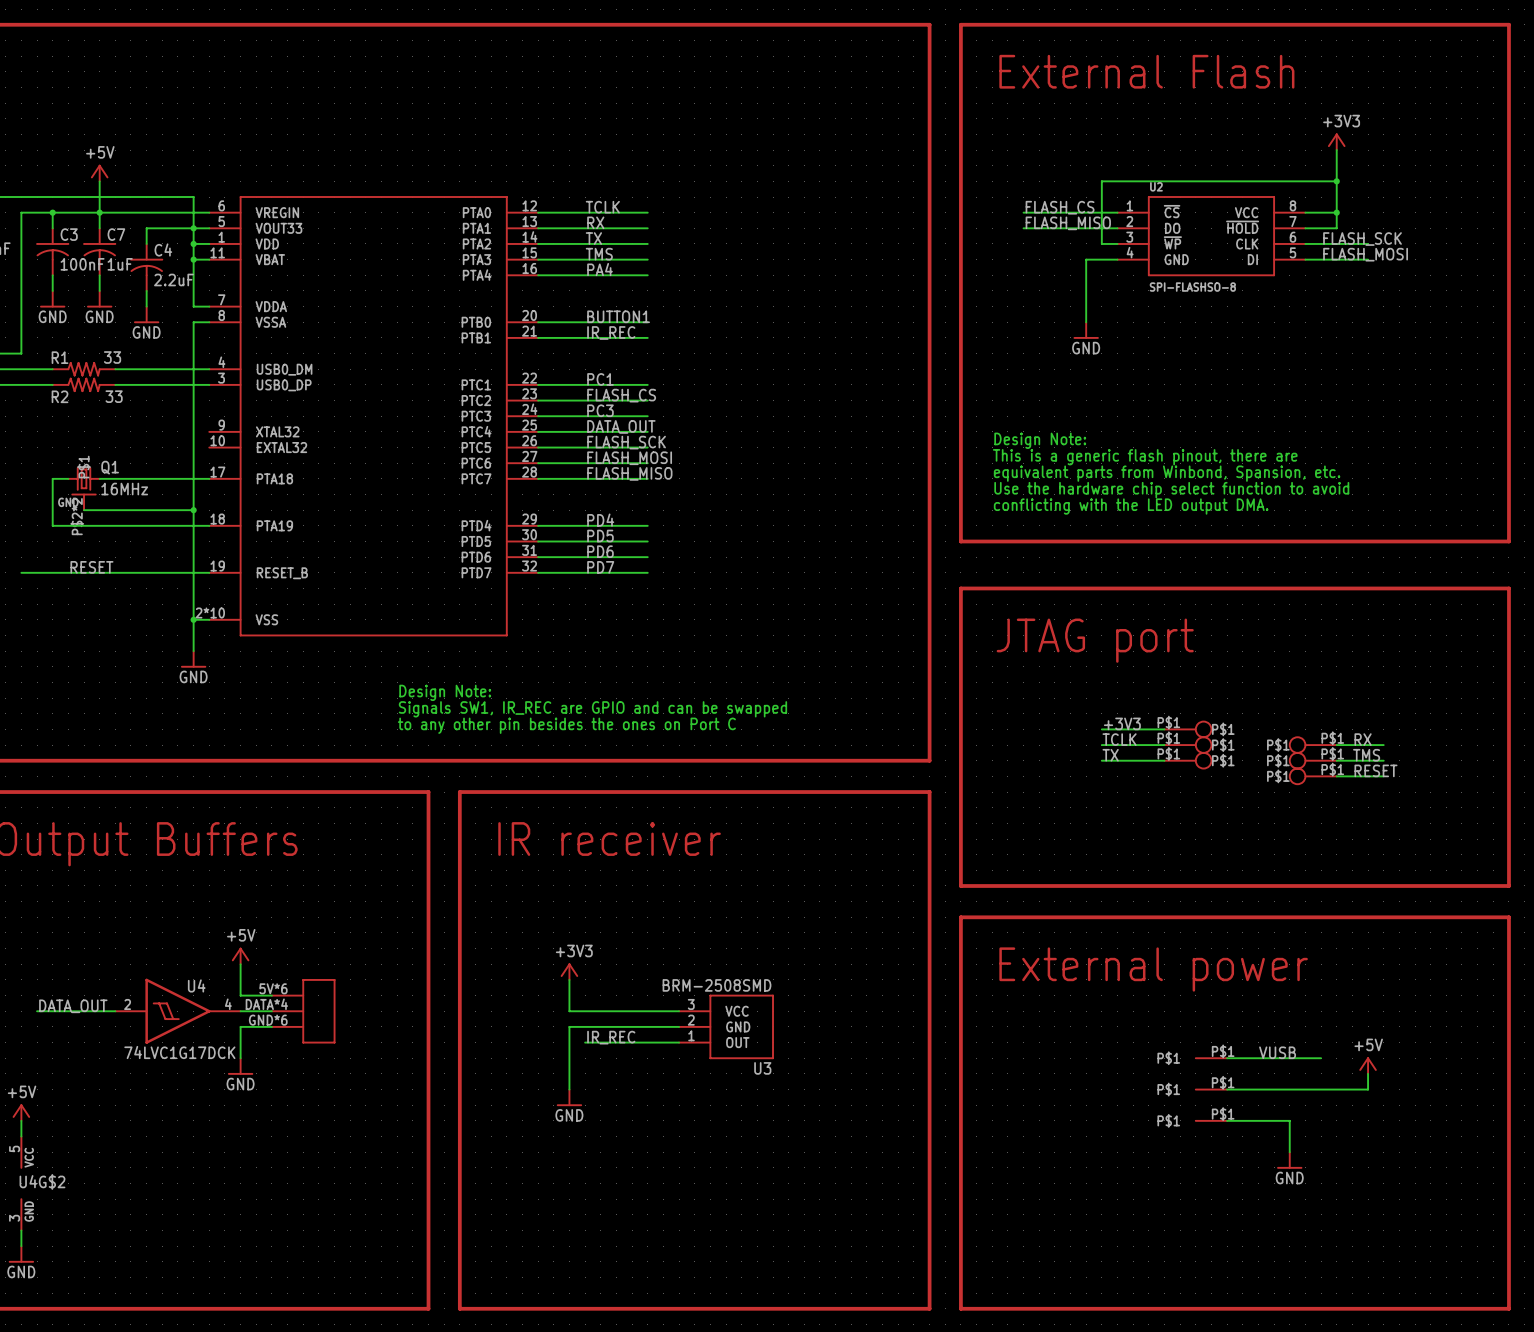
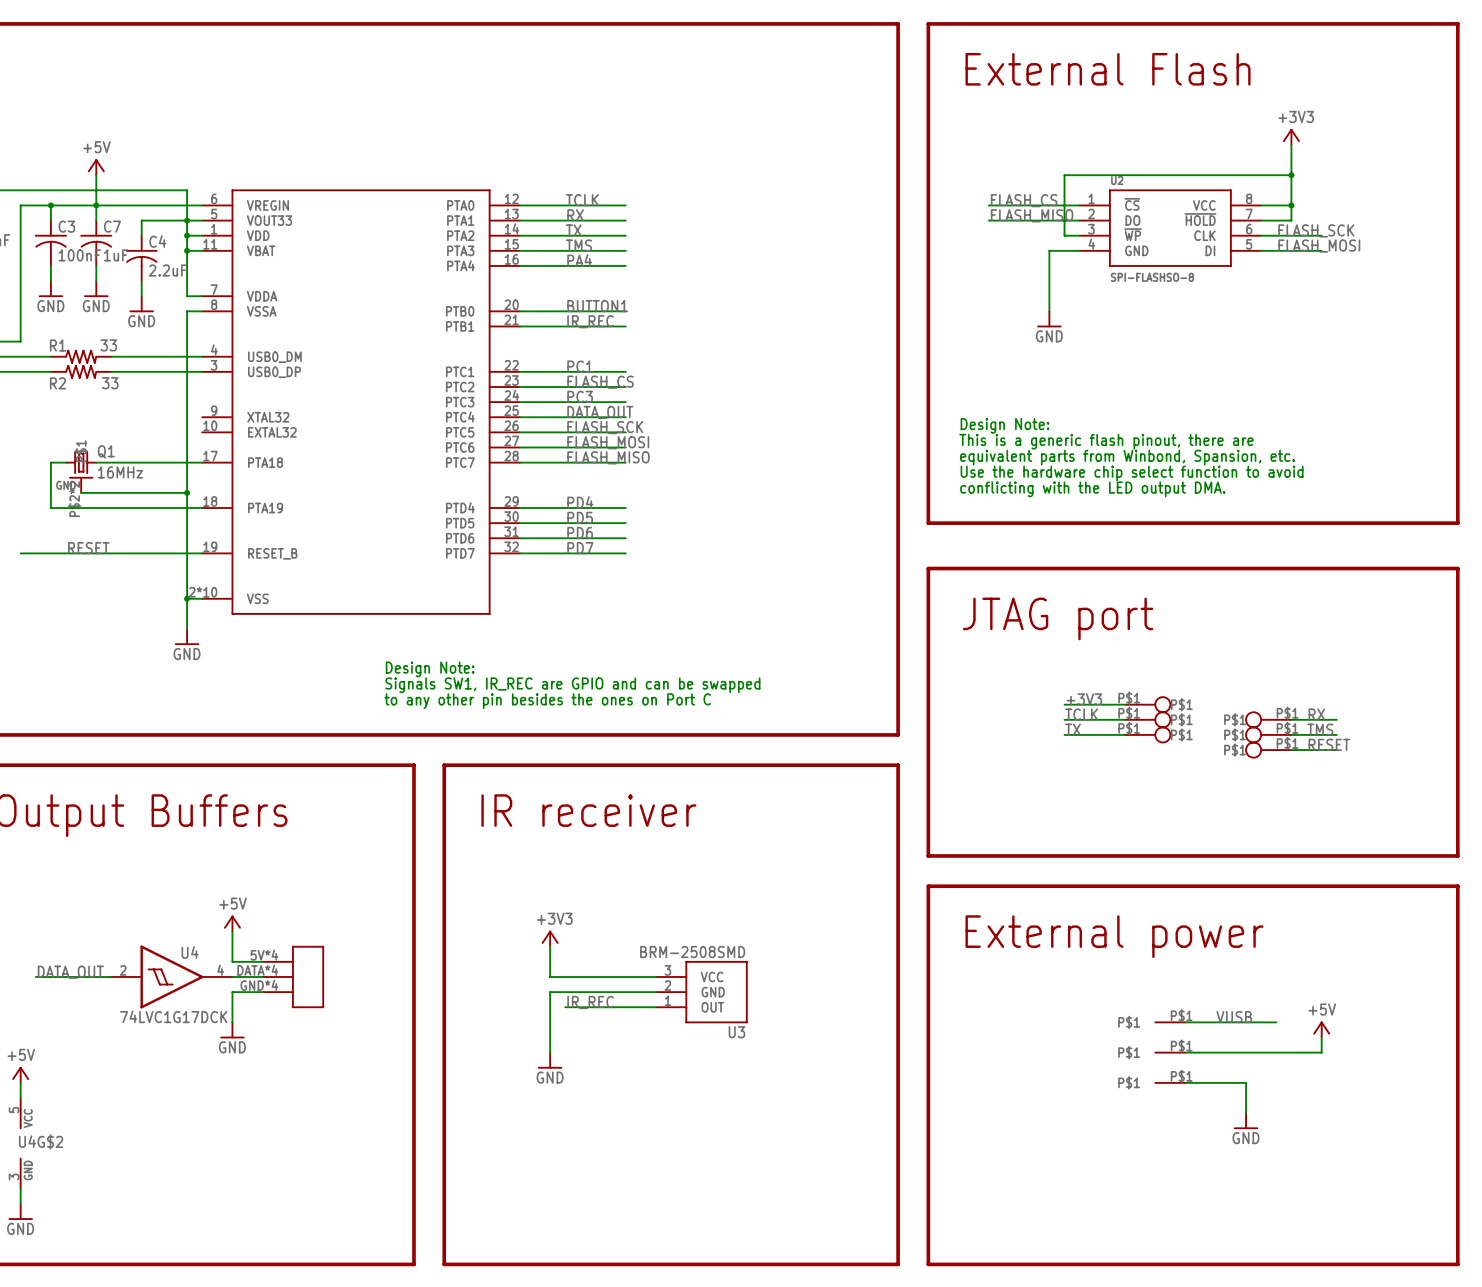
part pin number: 5V*6 (273, 988) -> 5V*4 (264, 955)
part pin number: GND*6 (268, 1020) -> GND*4 (259, 985)

